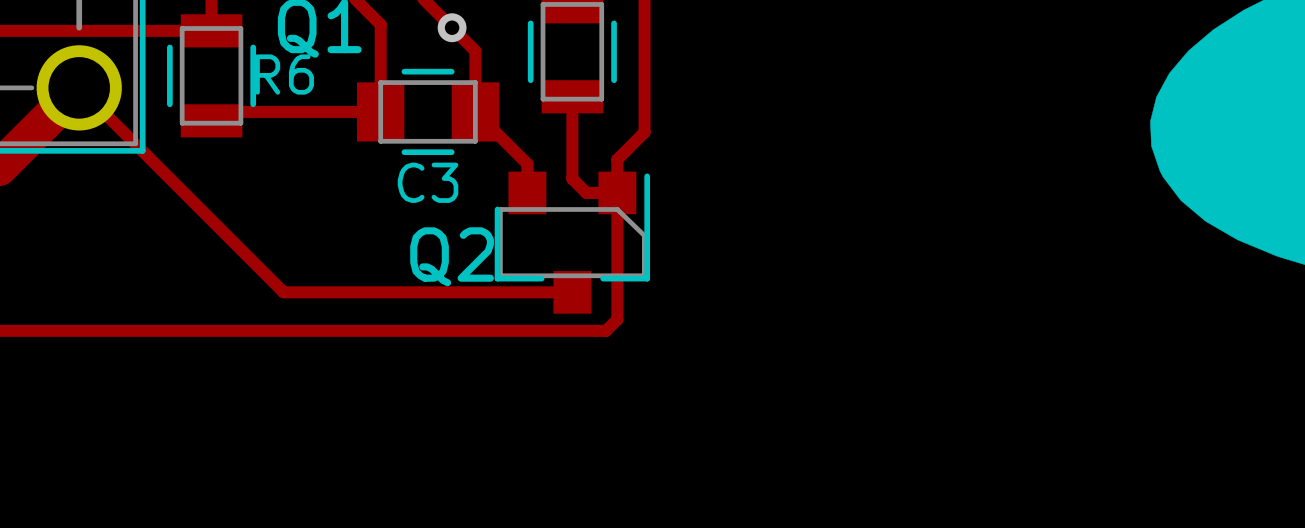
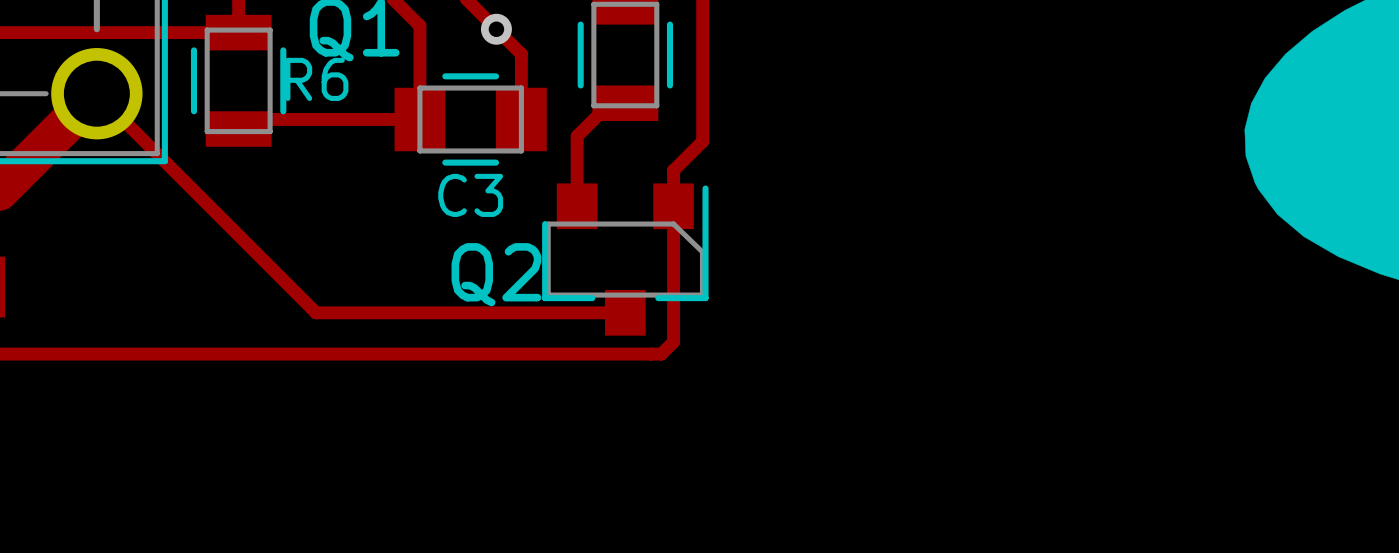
track: (572, 96) (572, 178) (586, 192) (617, 192) -> (625, 103) (610, 103) (577, 136) (577, 175)
track: (475, 111) (527, 163) -> none

